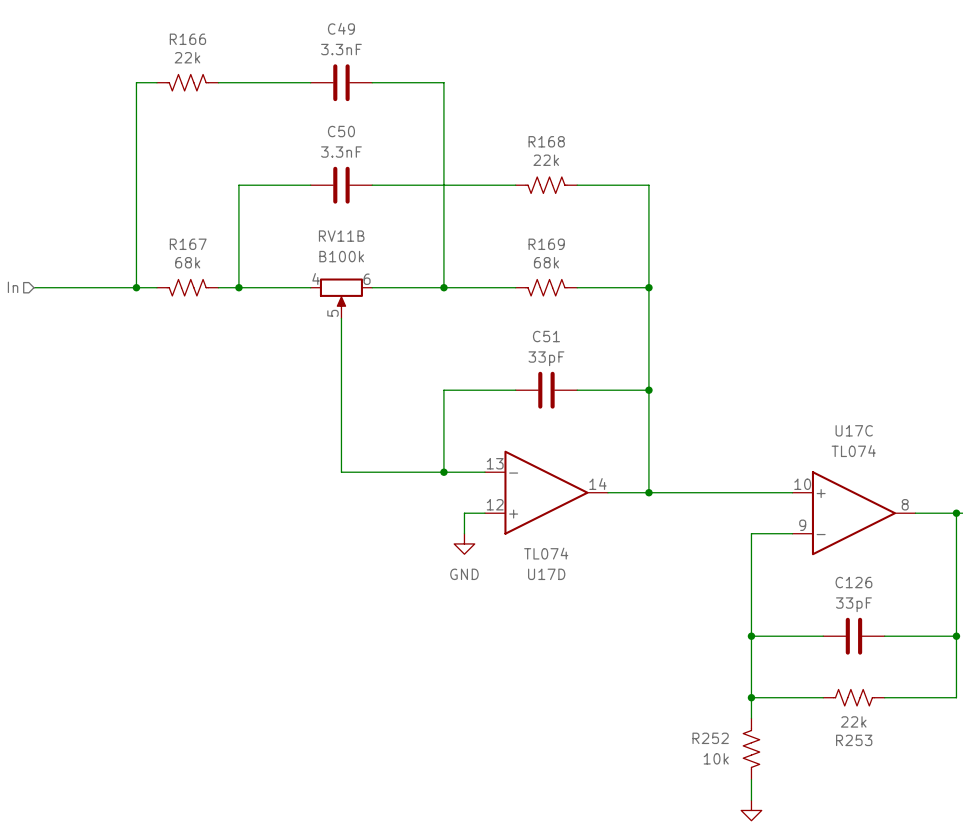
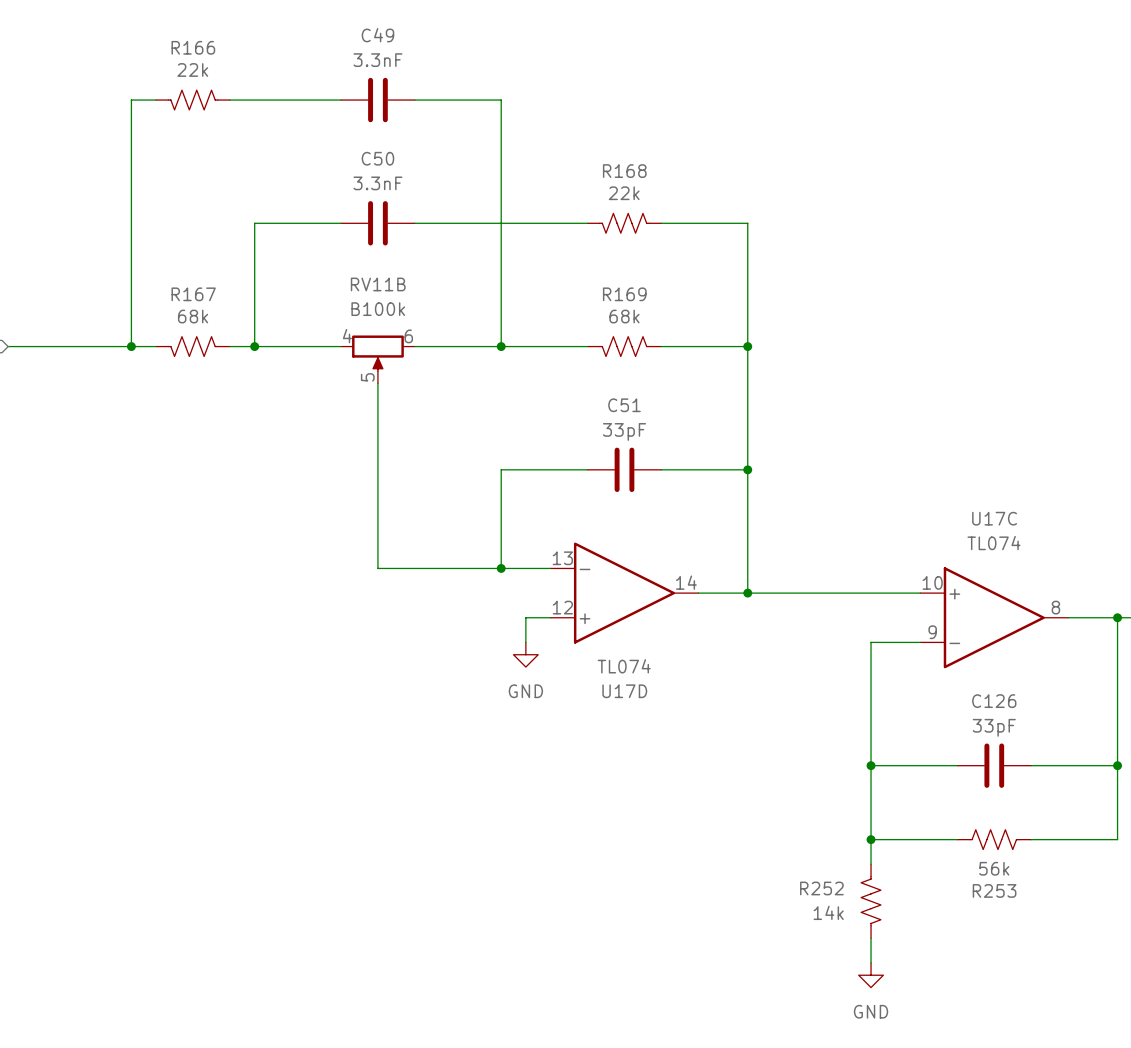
R253 value: 22k (853, 721) -> 56k (994, 868)
R252 value: 10k (716, 758) -> 14k (828, 912)

